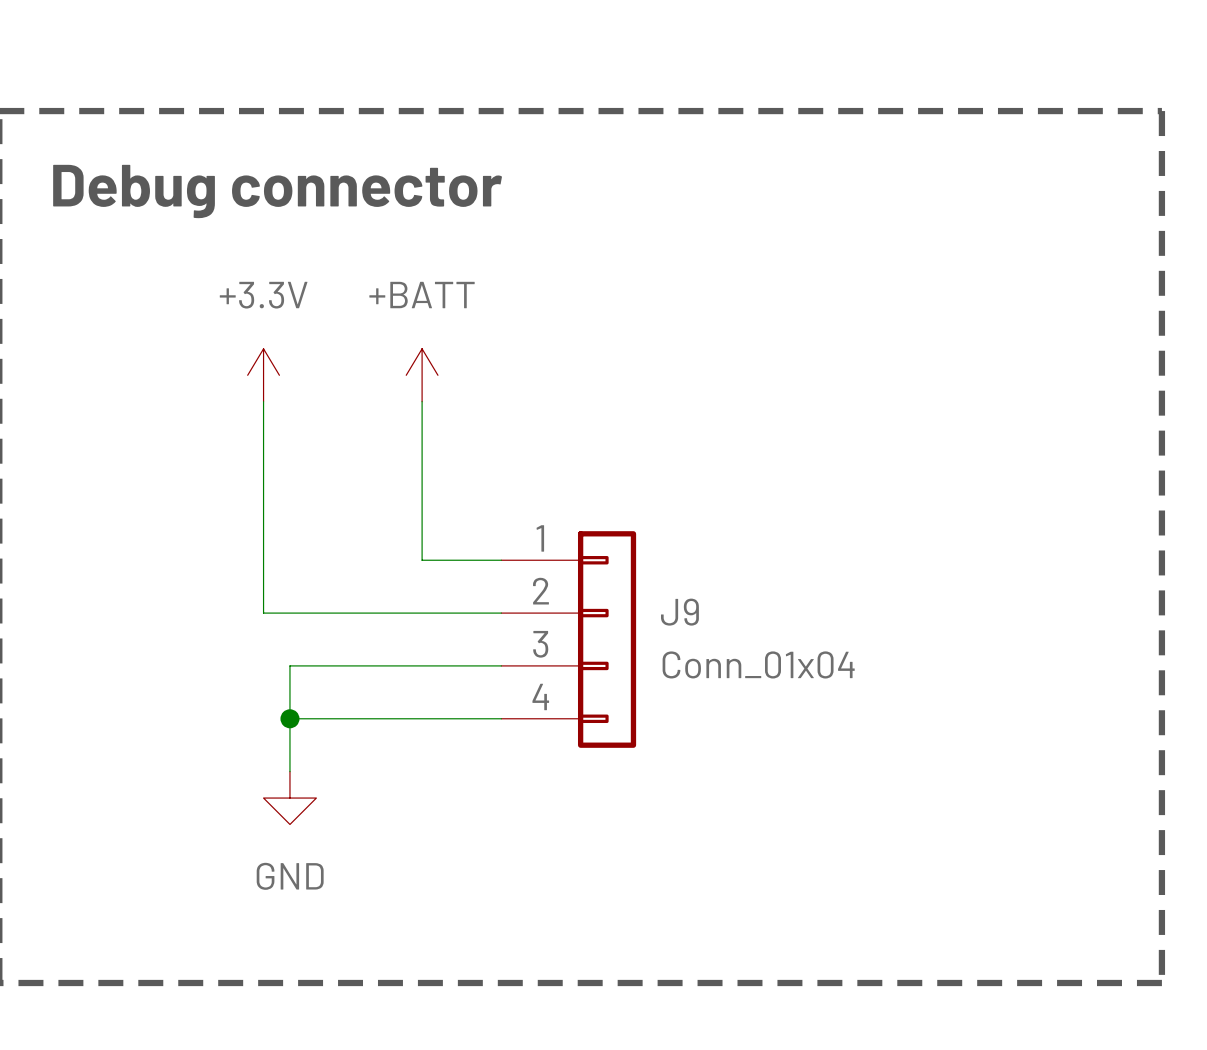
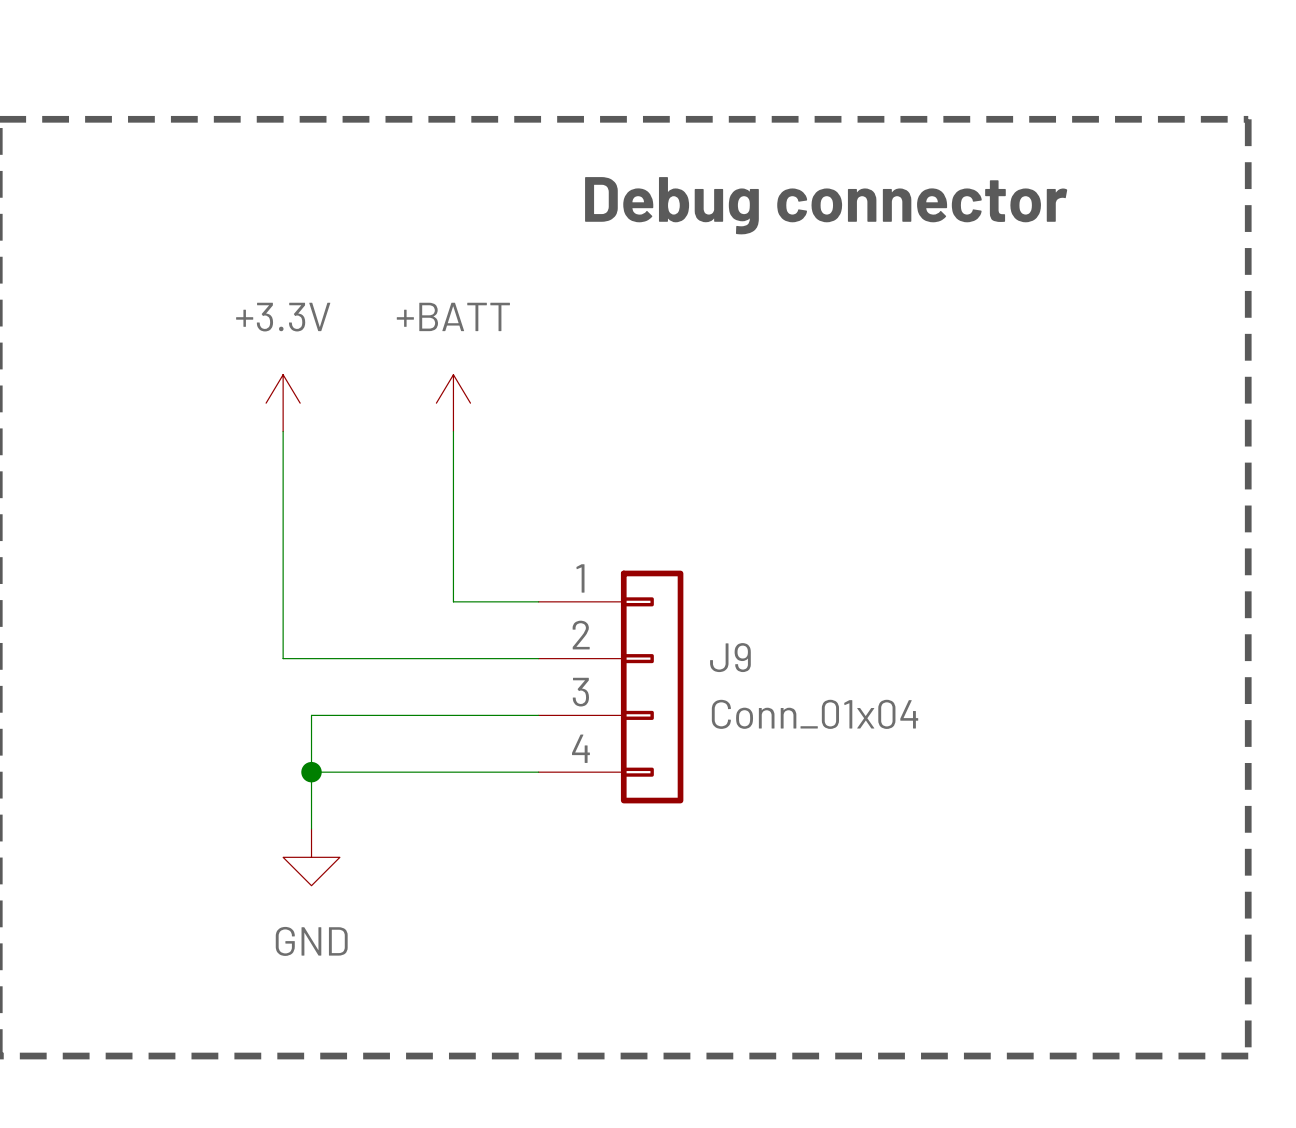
text position: Debug connector (277, 191) -> Debug connector (826, 205)

